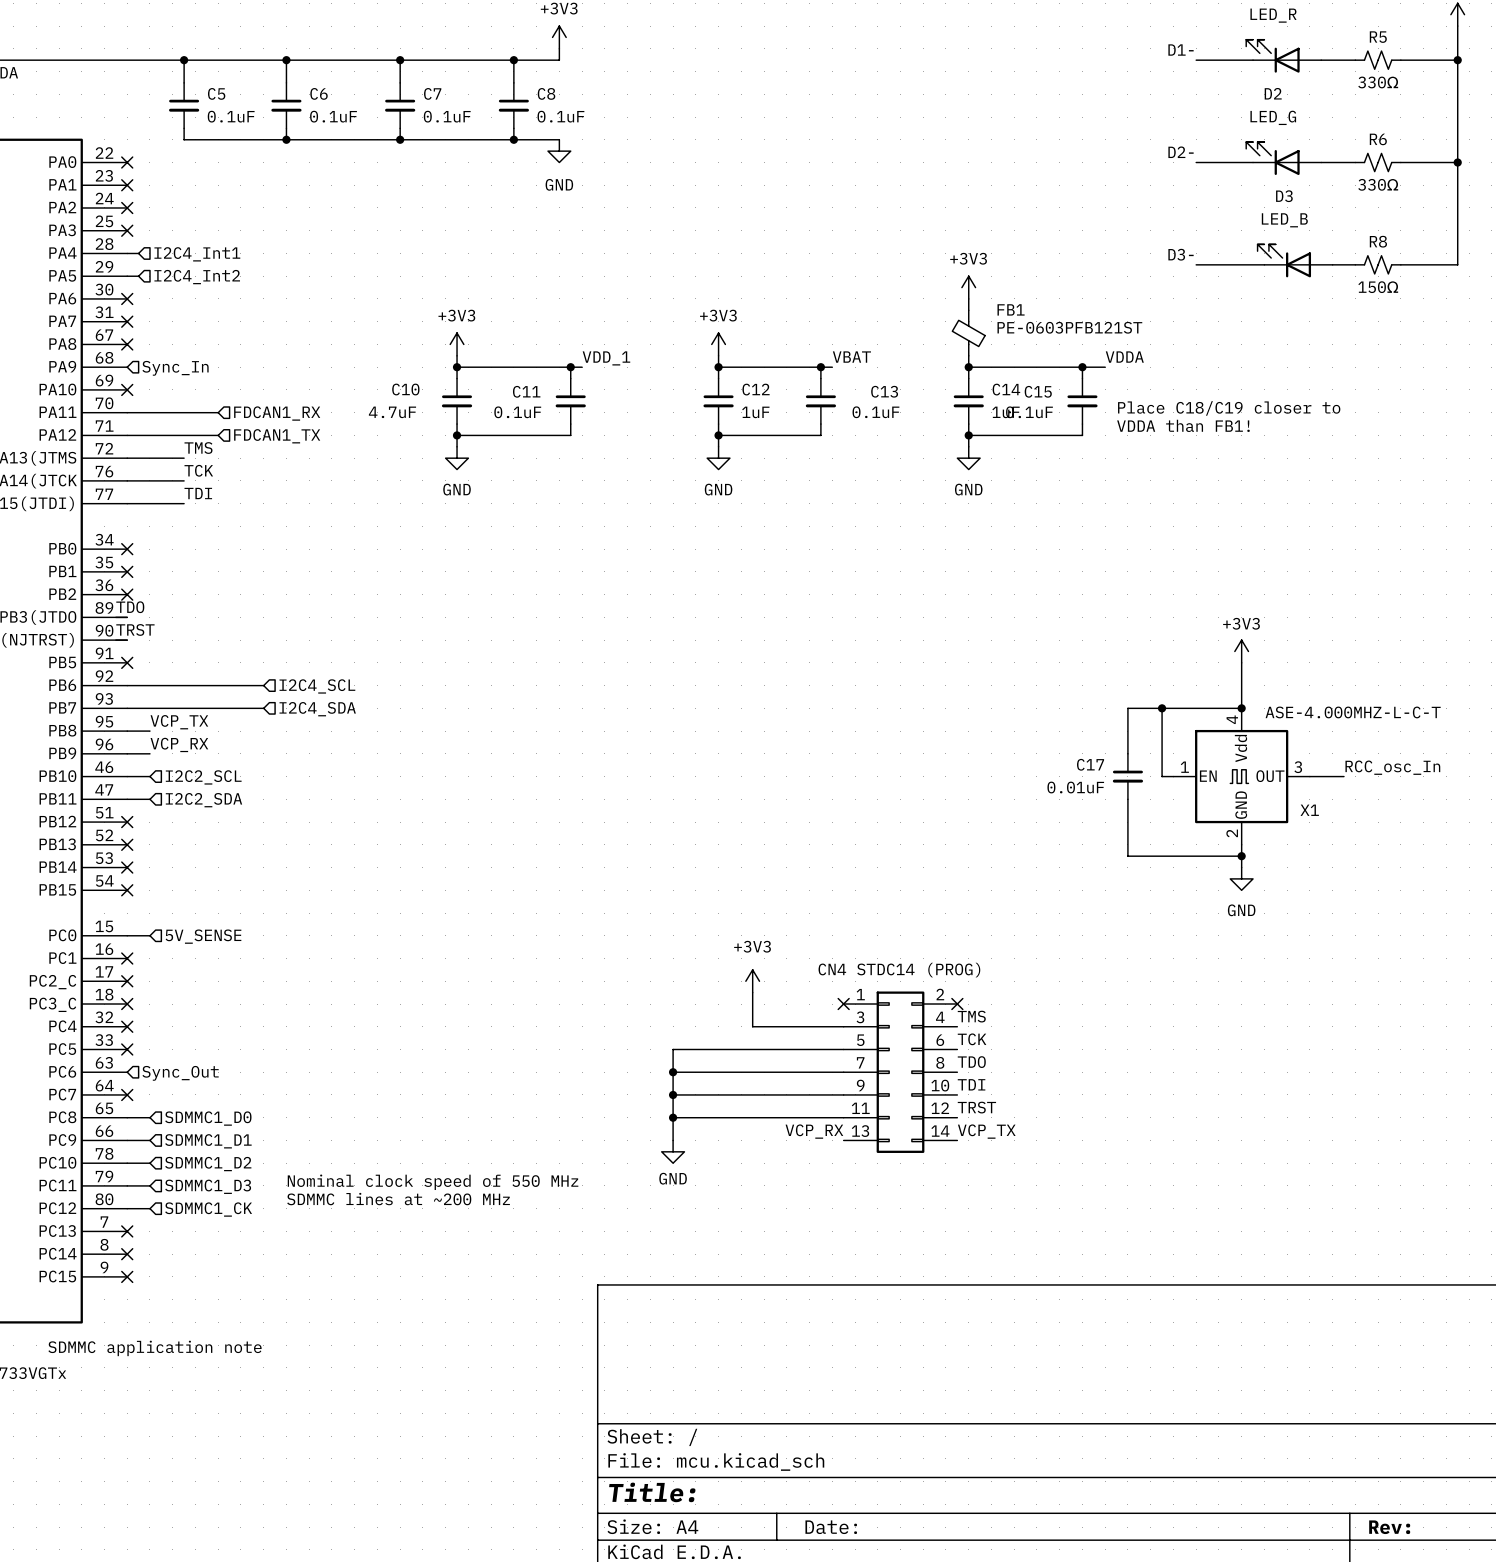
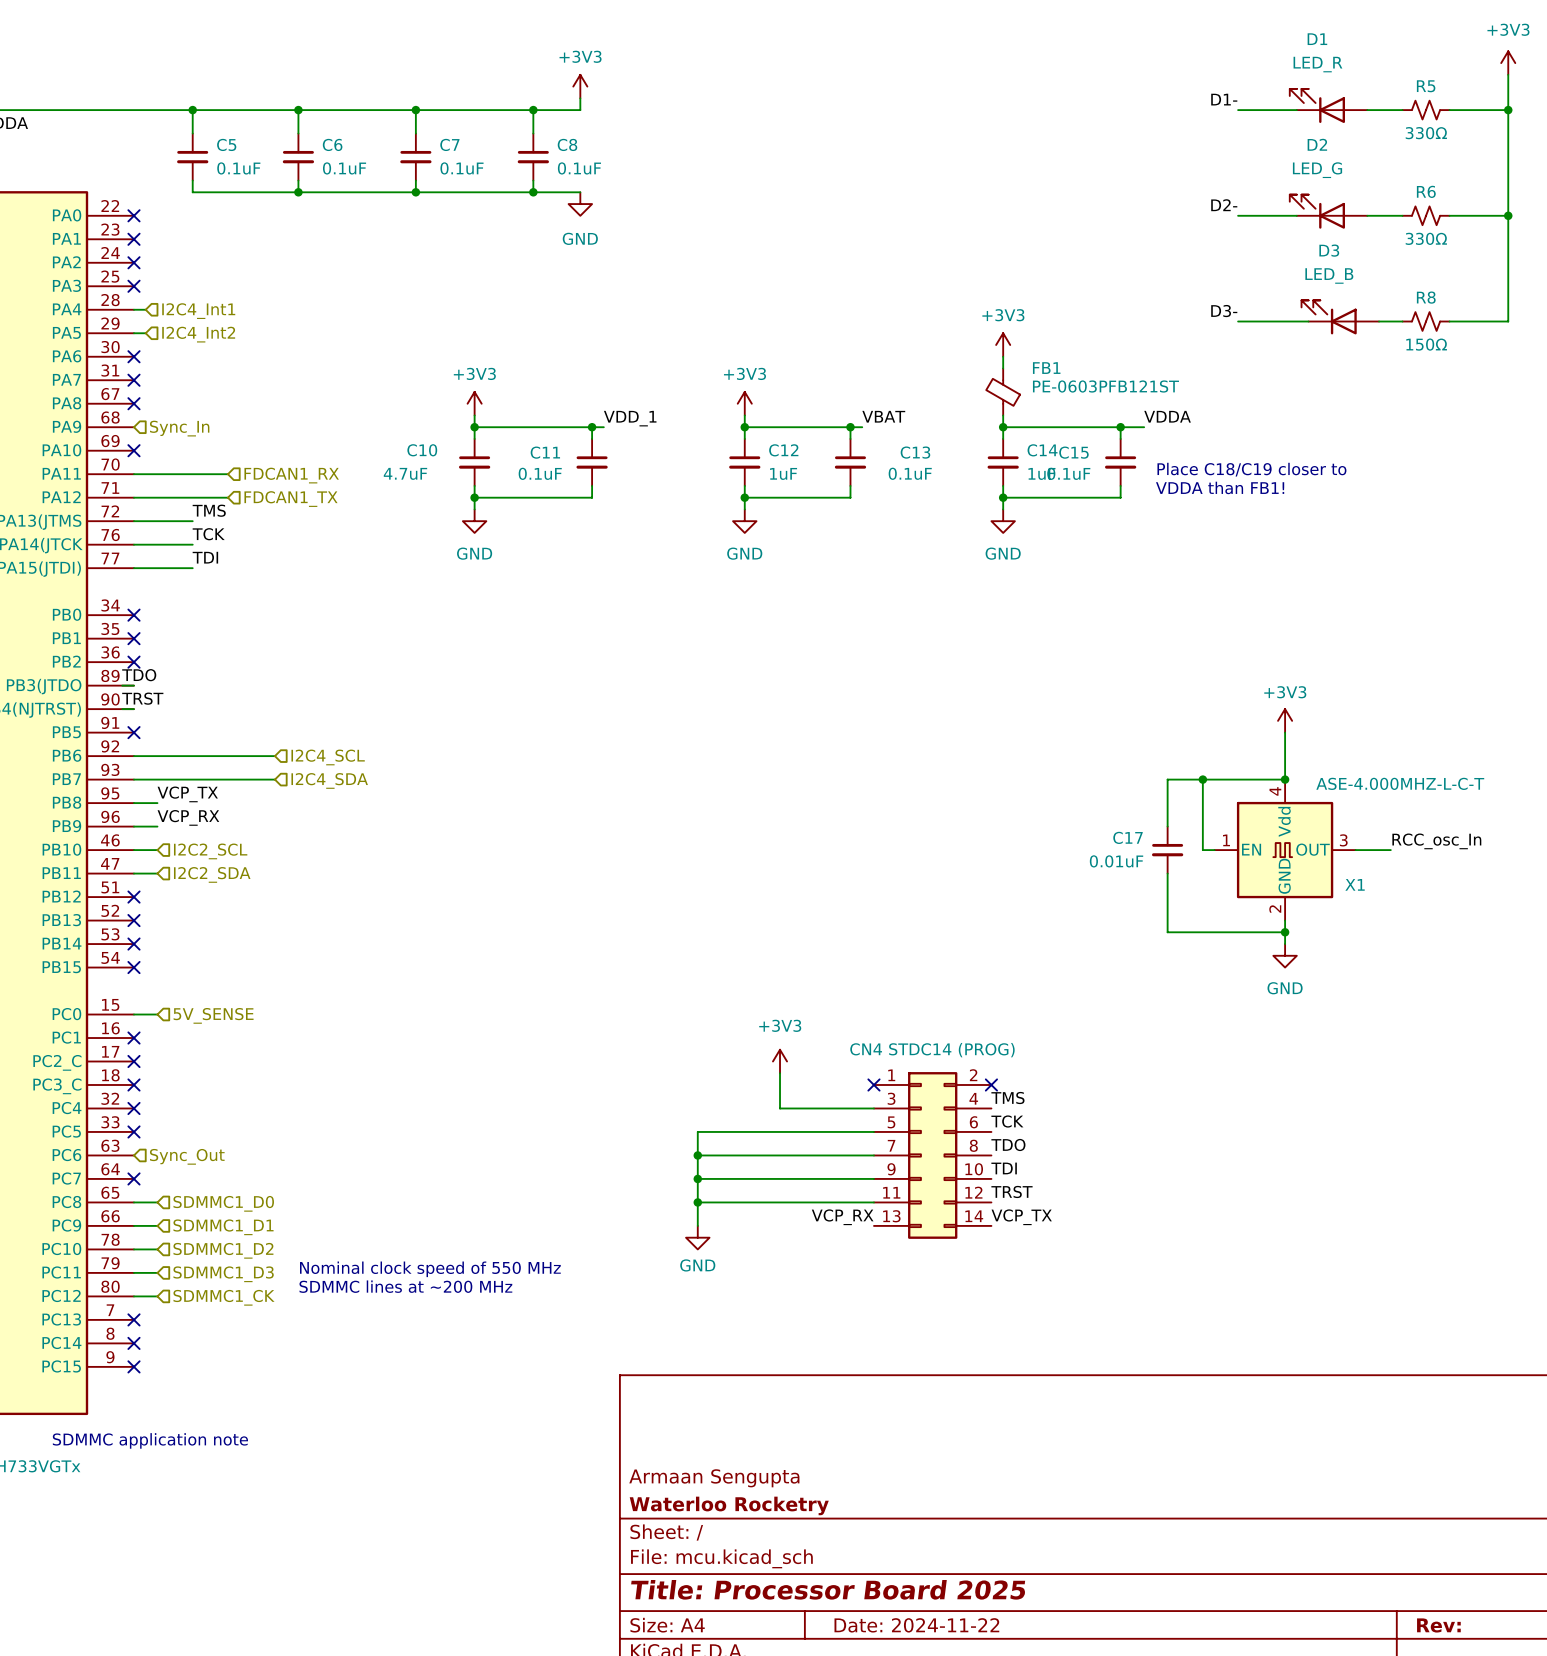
title block: none -> Armaan Sengupta (714, 1478)
title block: none -> Waterloo Rocketry (729, 1505)
title block: Title: (652, 1492) -> Title: Processor Board 2025 (828, 1589)
title block: Date: (831, 1527) -> Date: 2024-11-22 (916, 1625)

